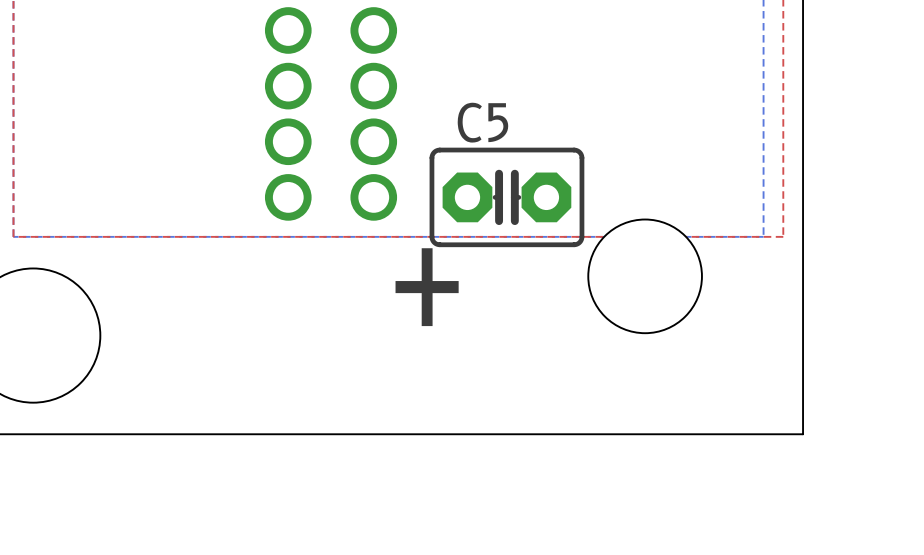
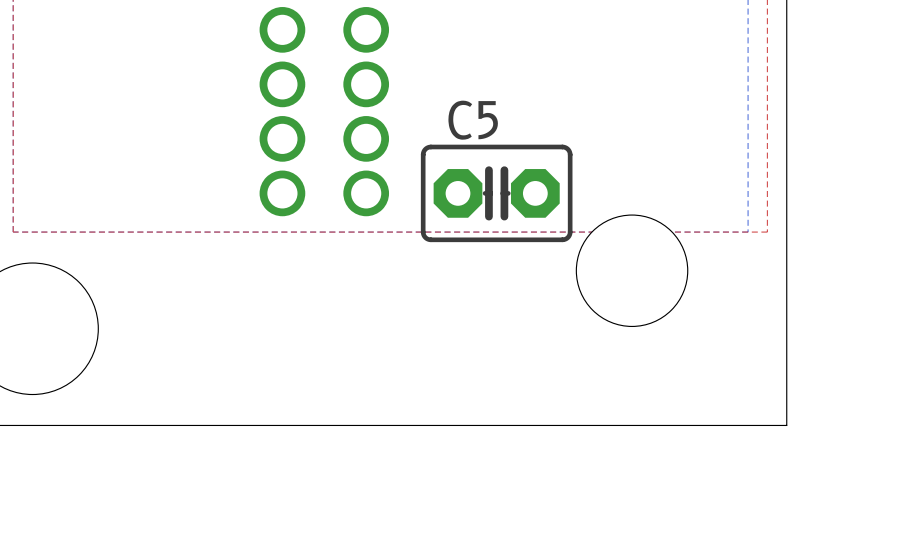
text: + (427, 287) -> none

